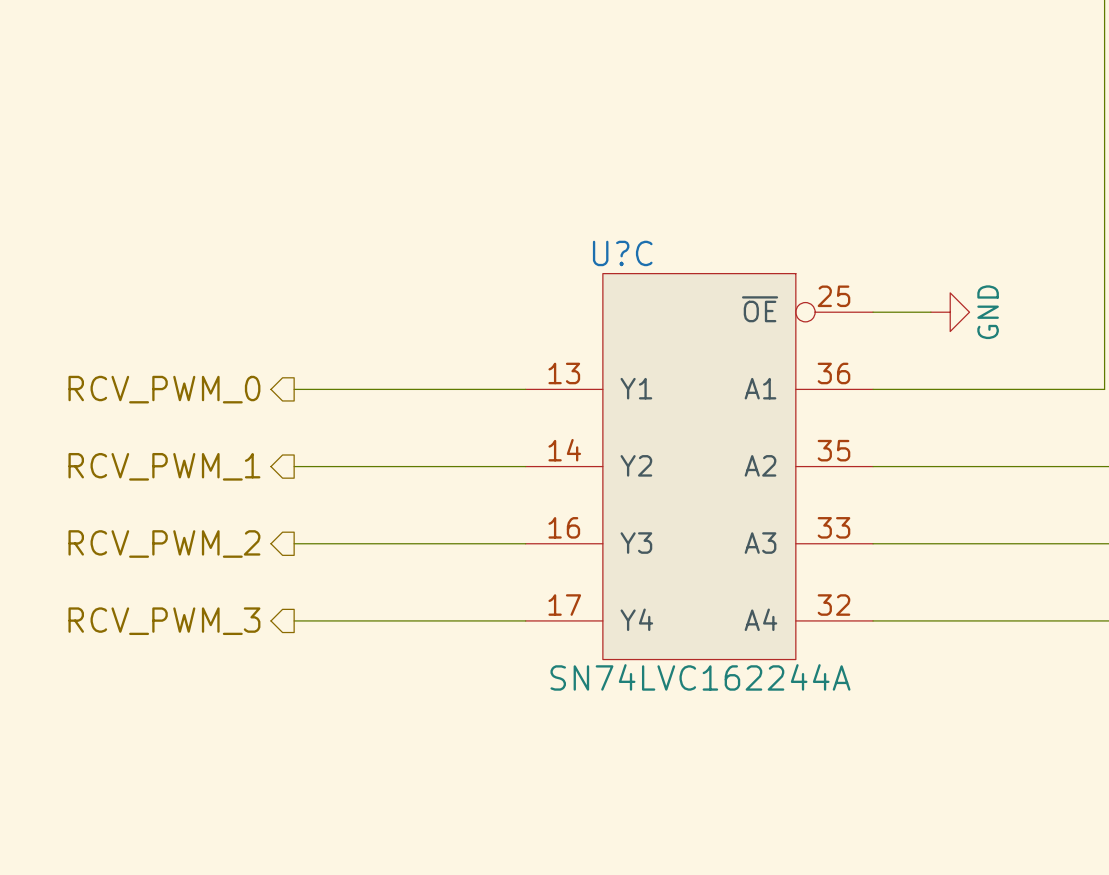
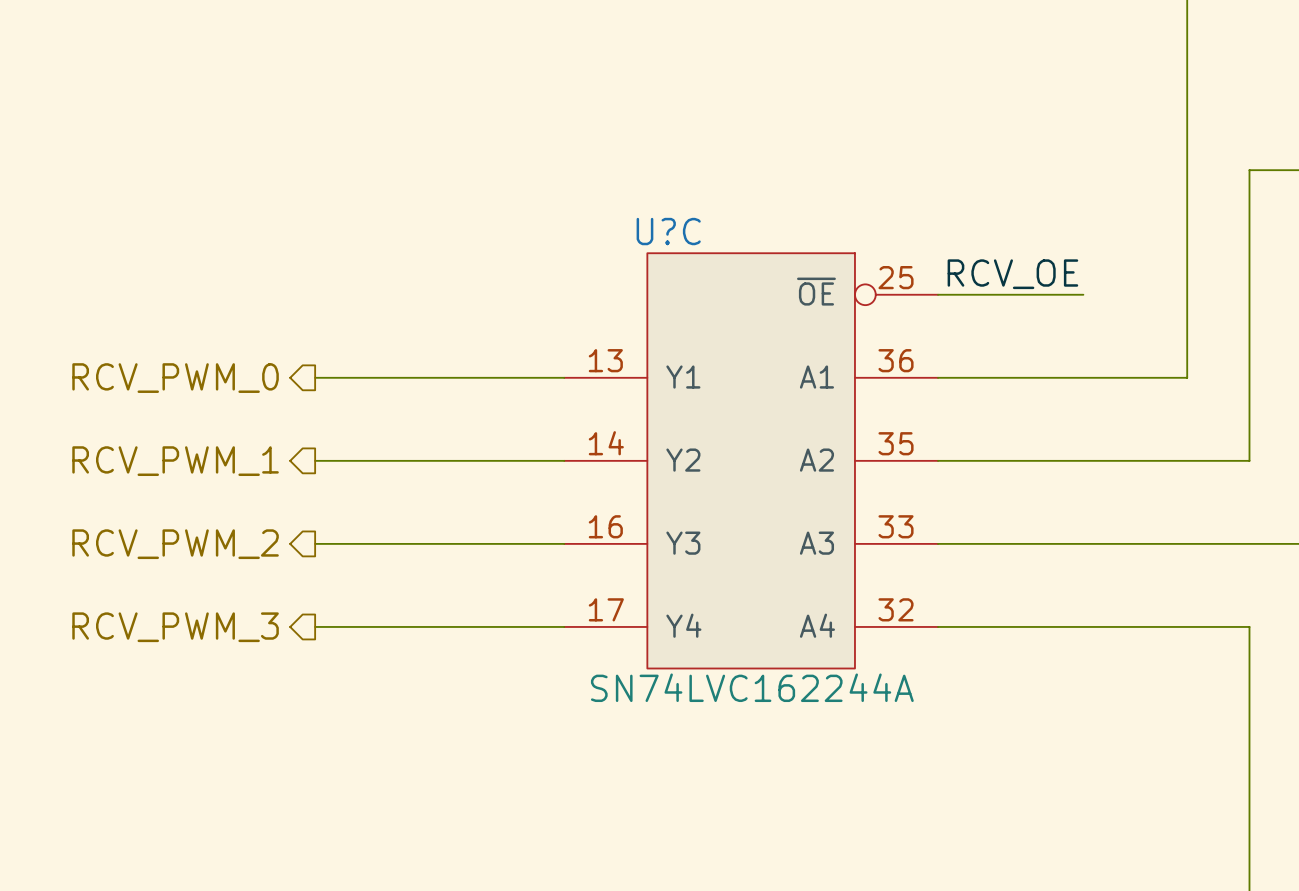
label: none -> RCV_OE (1012, 274)
wire: none -> (1000, 294) (1083, 294)
power symbol: GND (950, 312) -> none

